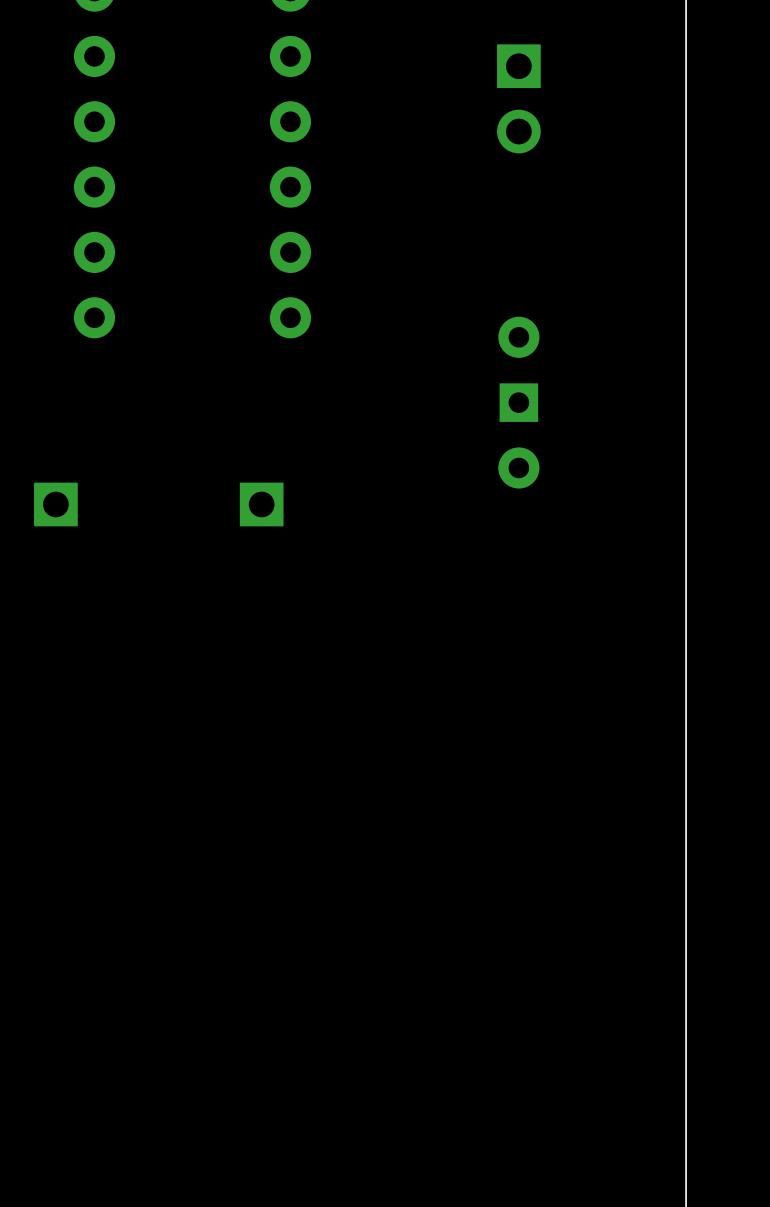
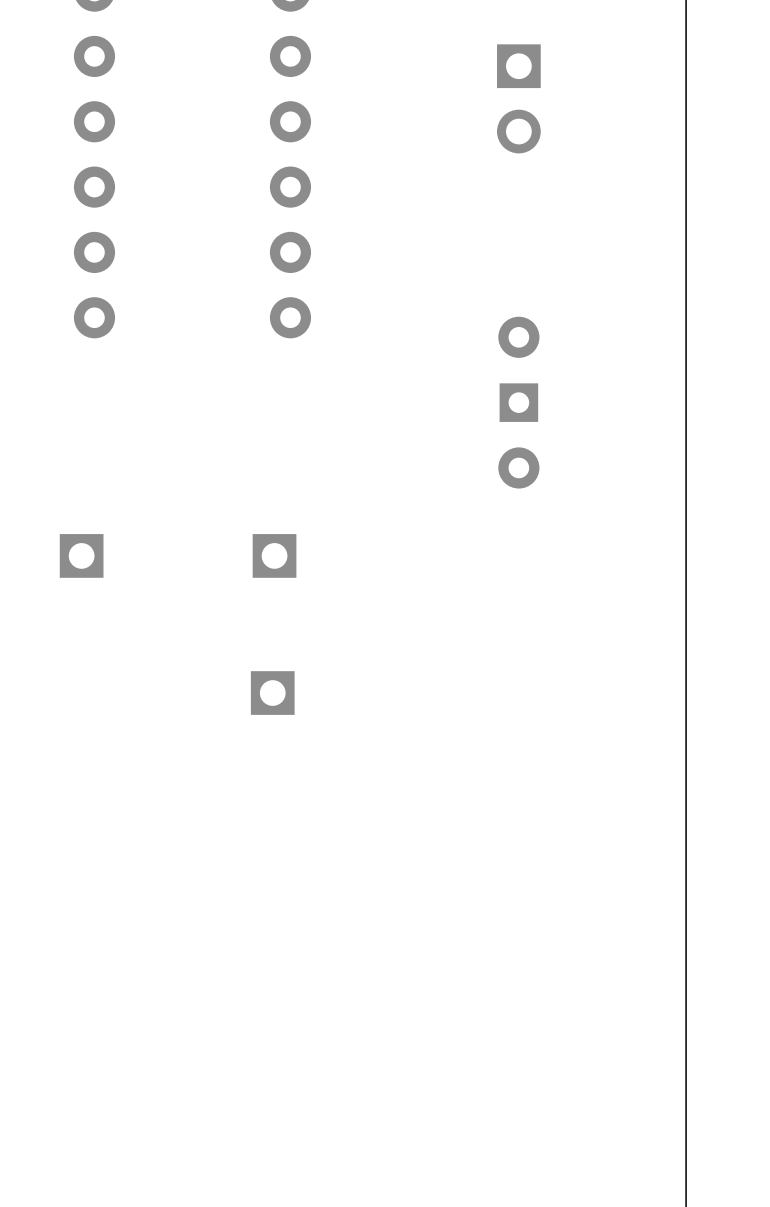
part position: (55, 504) -> (81, 555)
part position: (261, 504) -> (274, 555)
part: none -> (272, 693)

